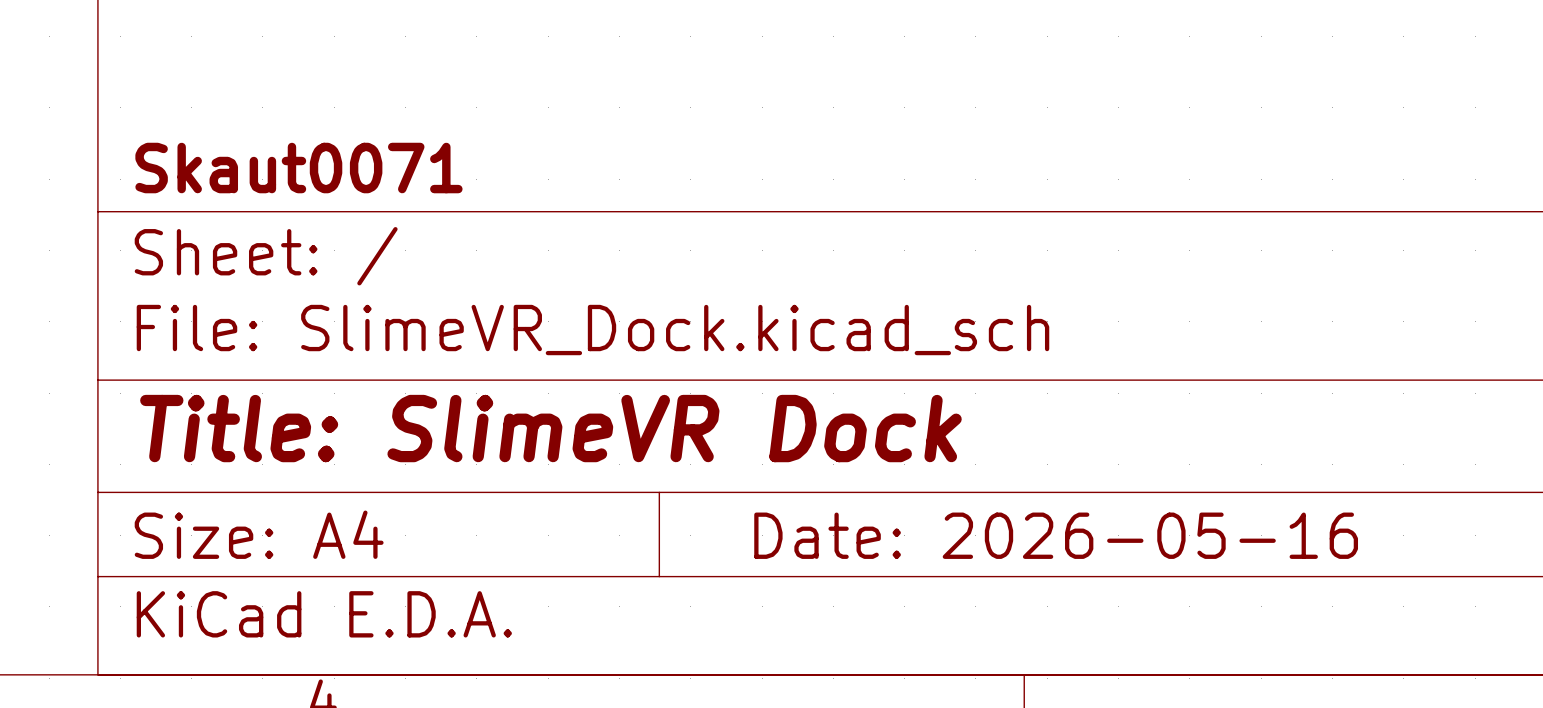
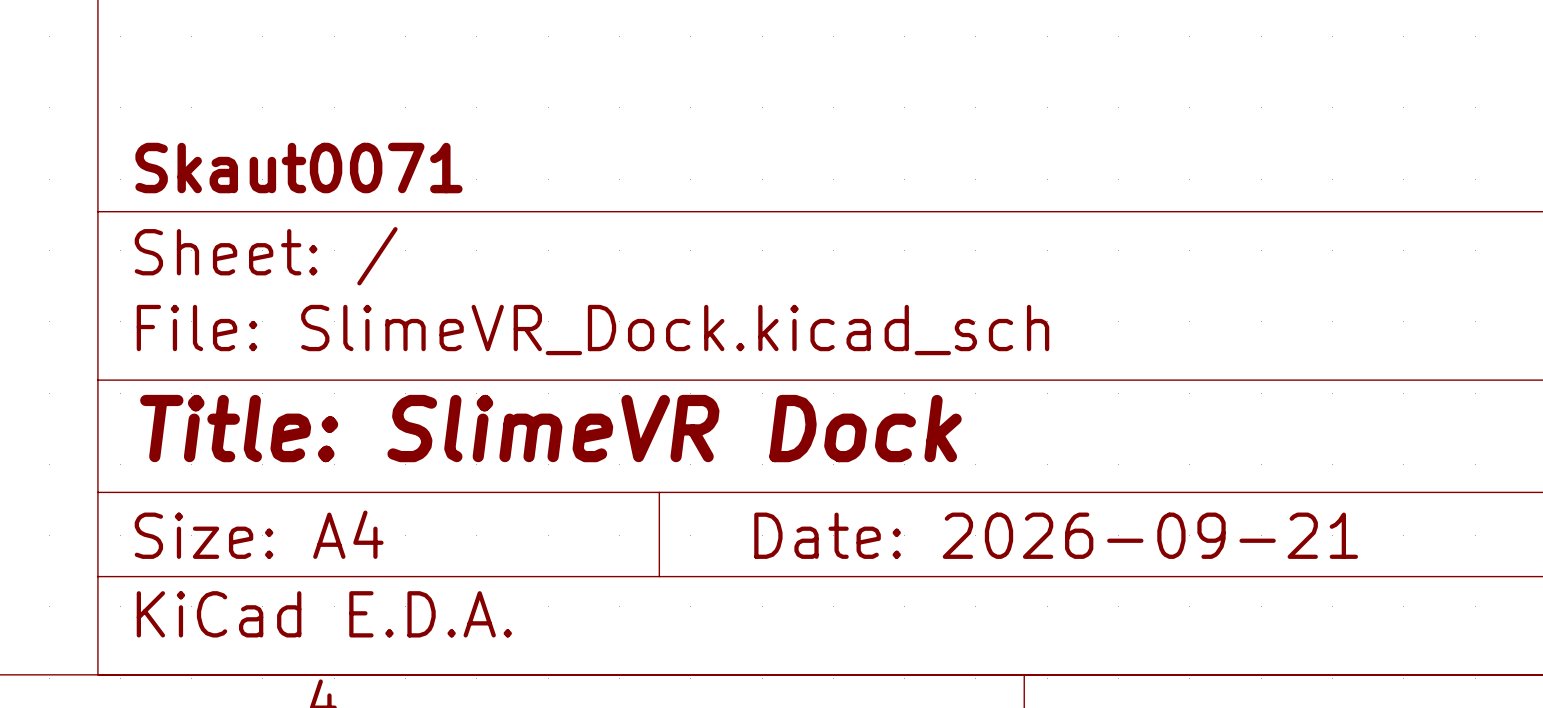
title block: Date: 2026-05-16 (1056, 535) -> Date: 2026-09-21 (1056, 535)

